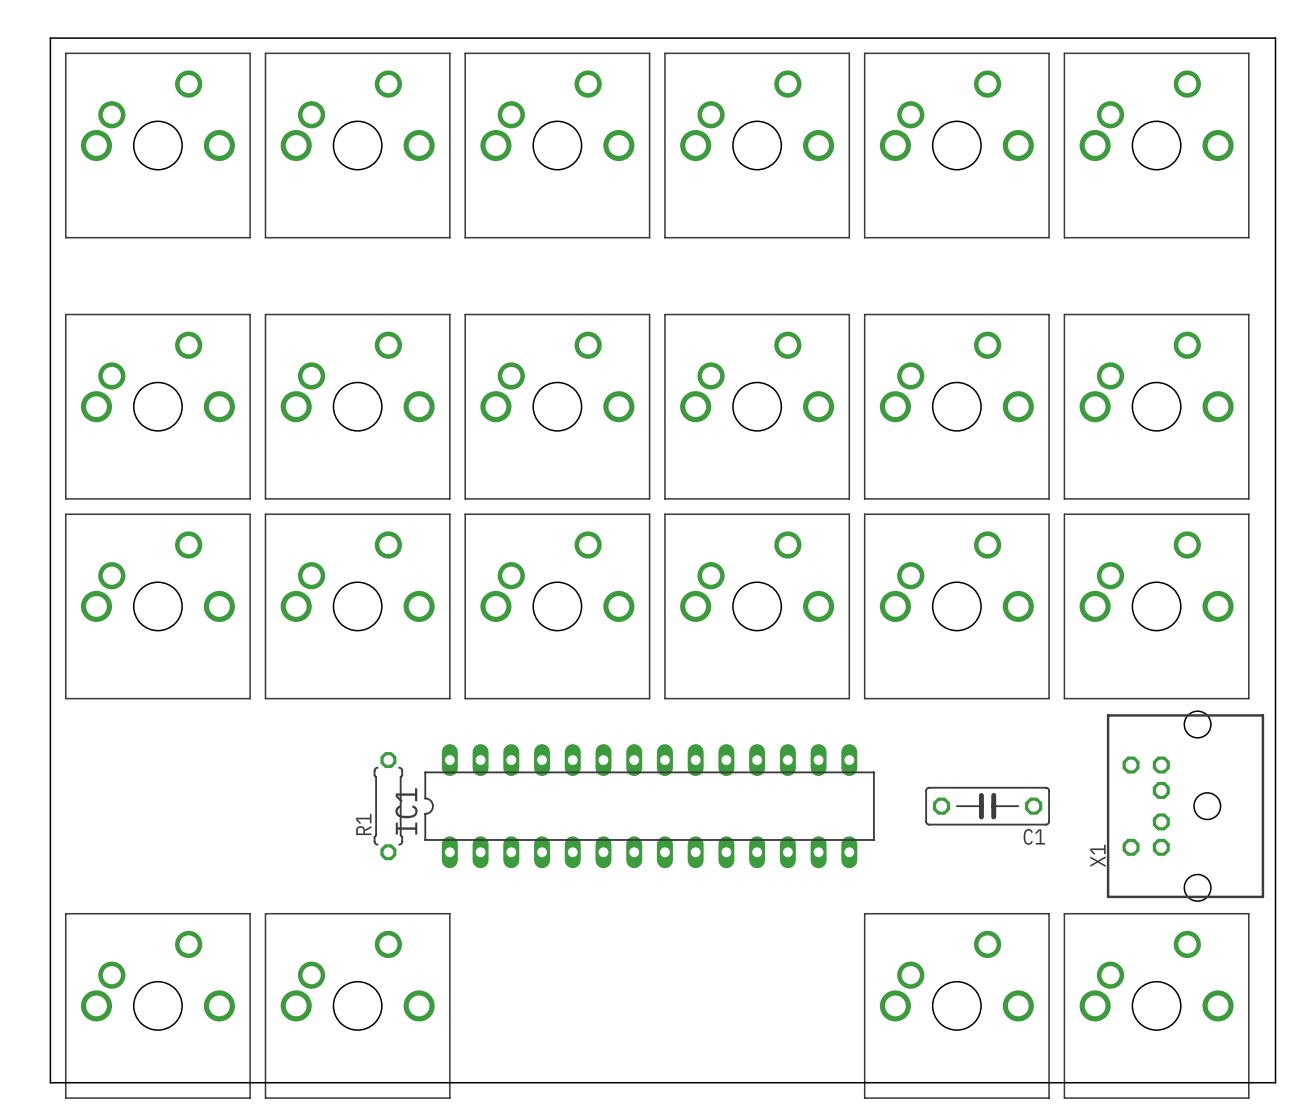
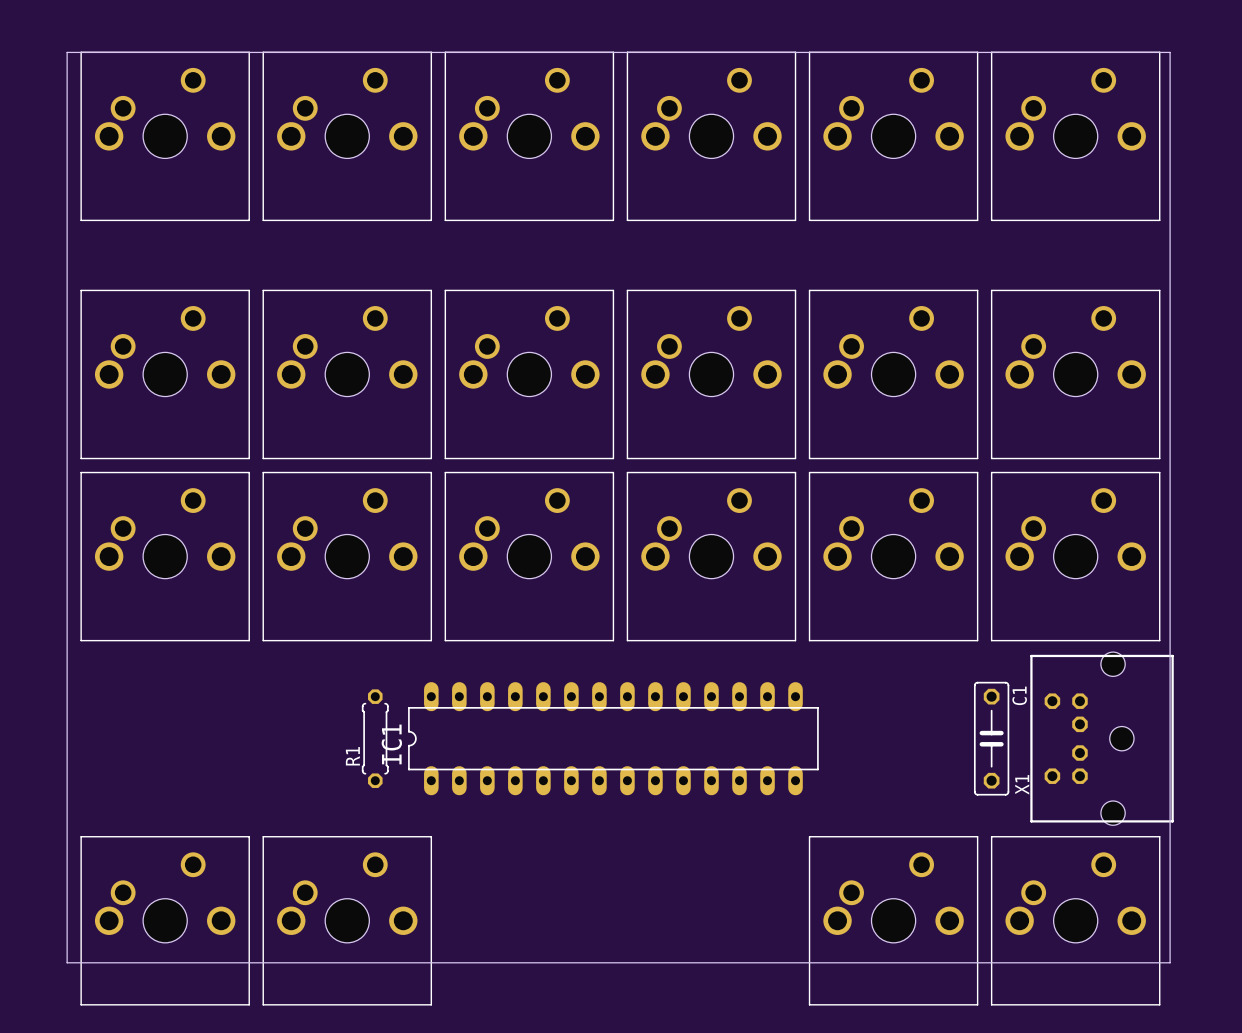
board edge: (50, 53) (50, 38) (1275, 38) (1275, 1082) (50, 1082) (50, 1052) -> (67, 52) (1170, 52) (1170, 962) (67, 962)
C1 rotation: 0° (987, 806) -> 90° clockwise (991, 738)
C1 position: (987, 806) -> (991, 738)
C1 name position: C1 (1034, 836) -> C1 (1019, 695)

